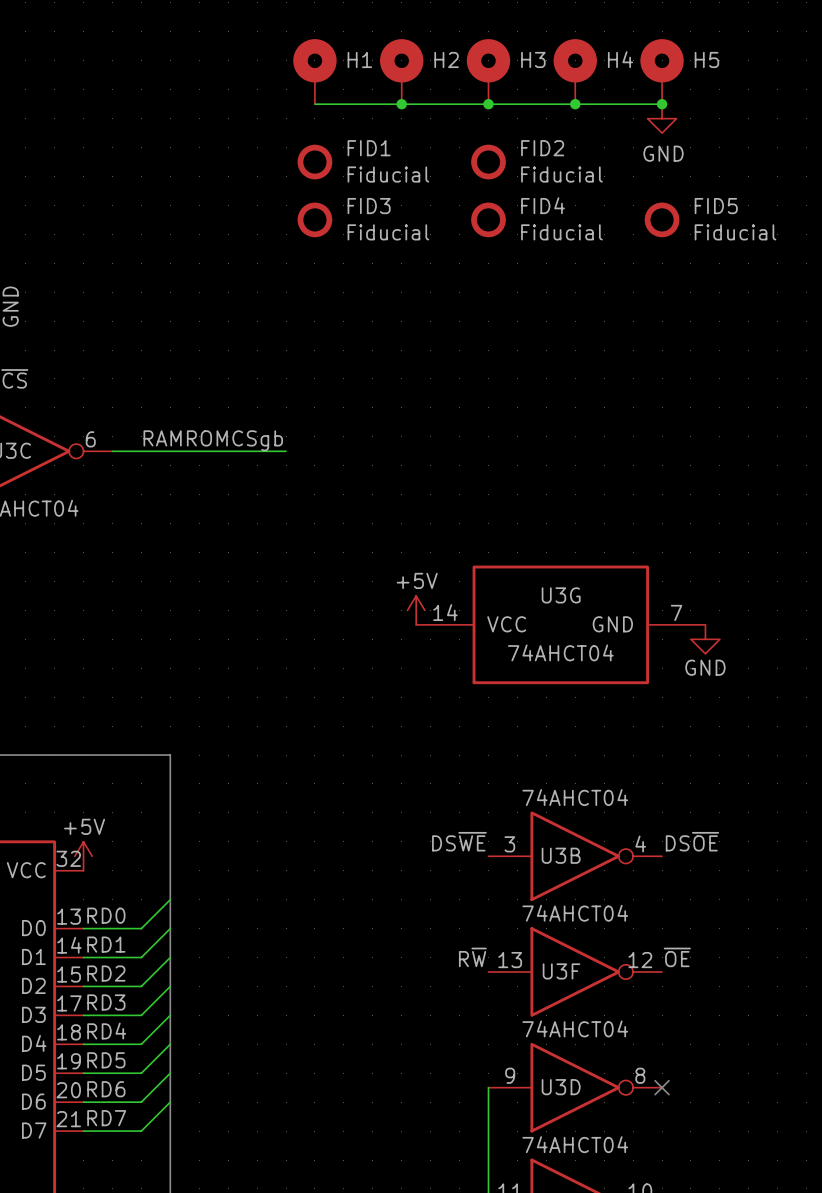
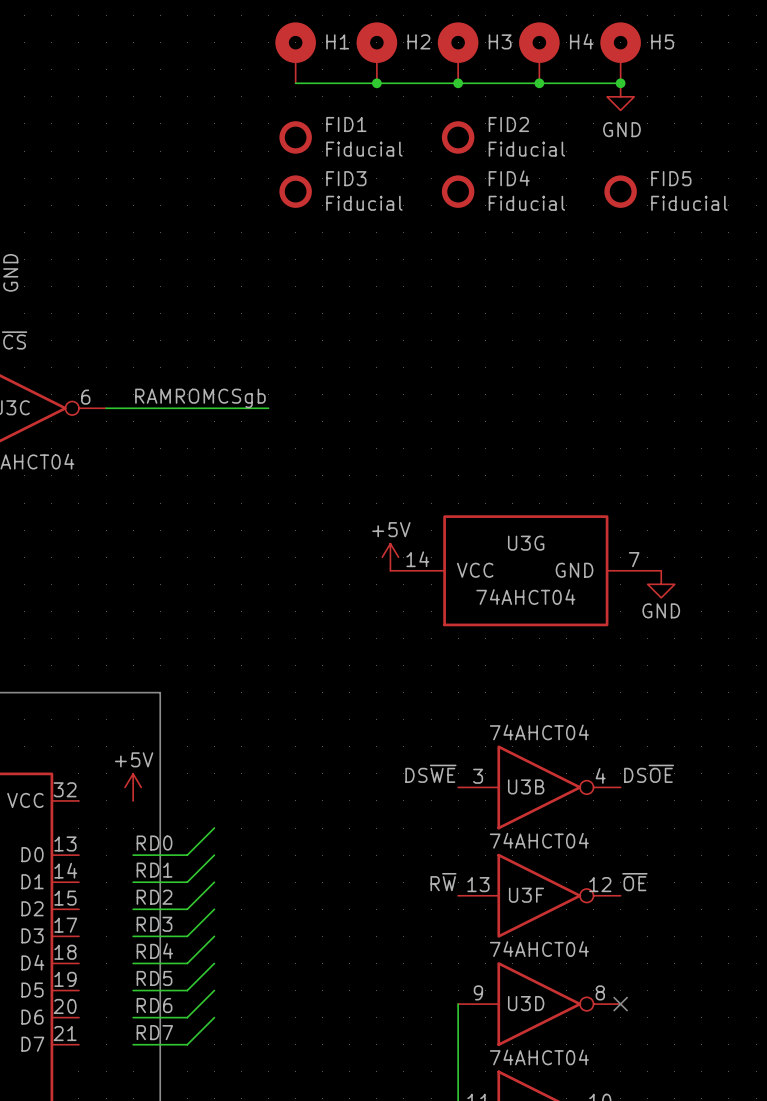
power symbol position: +5V (83, 856) -> +5V (133, 787)
wire: (170, 899) (141, 928) (83, 928) -> (214, 828) (187, 855) (133, 855)
label position: RD0 (106, 915) -> RD0 (154, 843)
wire: (170, 928) (141, 957) (83, 957) -> (214, 855) (187, 882) (133, 882)
label position: RD1 (106, 944) -> RD1 (154, 870)
wire: (170, 957) (141, 986) (83, 986) -> (214, 882) (187, 909) (133, 909)
label position: RD2 (106, 973) -> RD2 (154, 897)
wire: (170, 986) (141, 1015) (83, 1015) -> (214, 909) (187, 936) (133, 936)
label position: RD3 (106, 1002) -> RD3 (154, 924)
wire: (170, 1015) (141, 1044) (83, 1044) -> (214, 936) (187, 963) (133, 963)
label position: RD4 (106, 1031) -> RD4 (154, 951)
wire: (170, 1044) (141, 1073) (83, 1073) -> (214, 963) (187, 990) (133, 990)
label position: RD5 (106, 1060) -> RD5 (154, 978)
wire: (170, 1073) (141, 1102) (83, 1102) -> (214, 990) (187, 1017) (133, 1017)
label position: RD6 (106, 1089) -> RD6 (154, 1005)
wire: (170, 1102) (141, 1131) (83, 1131) -> (214, 1017) (187, 1044) (133, 1044)
label position: RD7 (106, 1118) -> RD7 (154, 1032)

